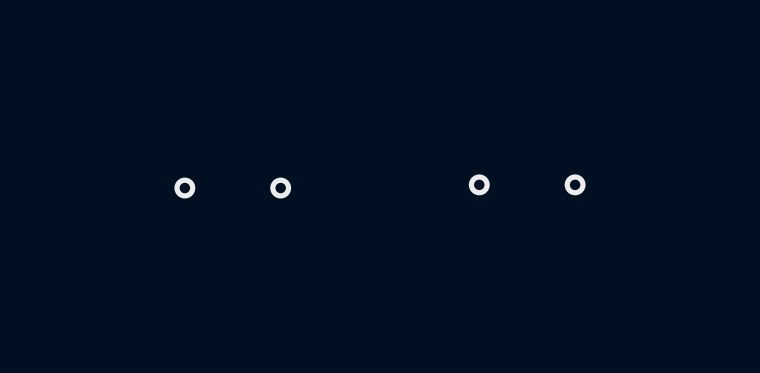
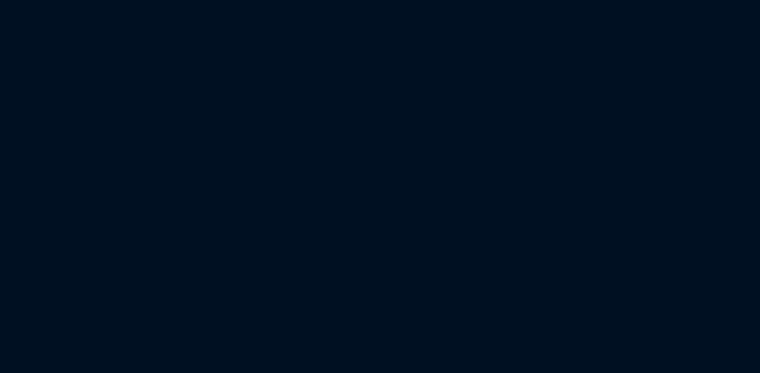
via: (479, 184) -> none
via: (575, 184) -> none
via: (184, 188) -> none
via: (280, 188) -> none

